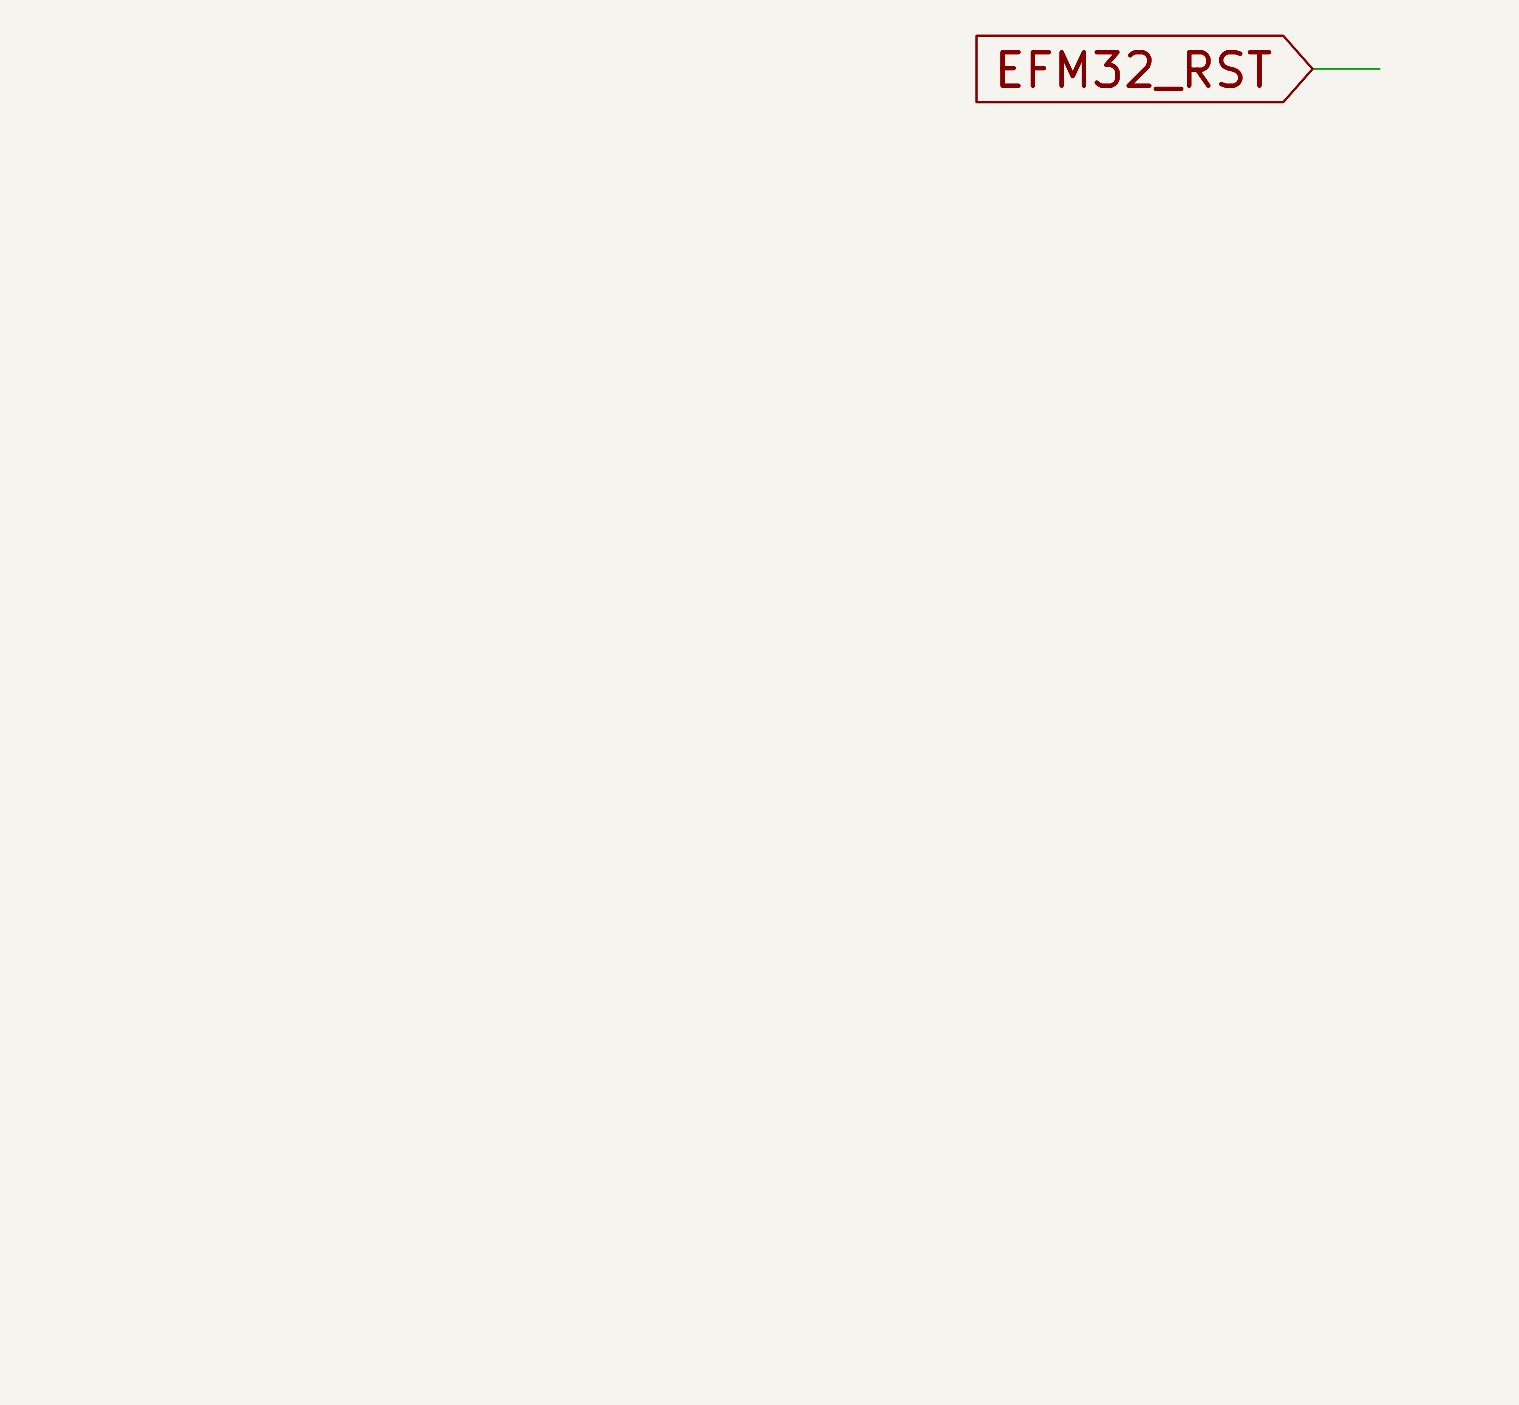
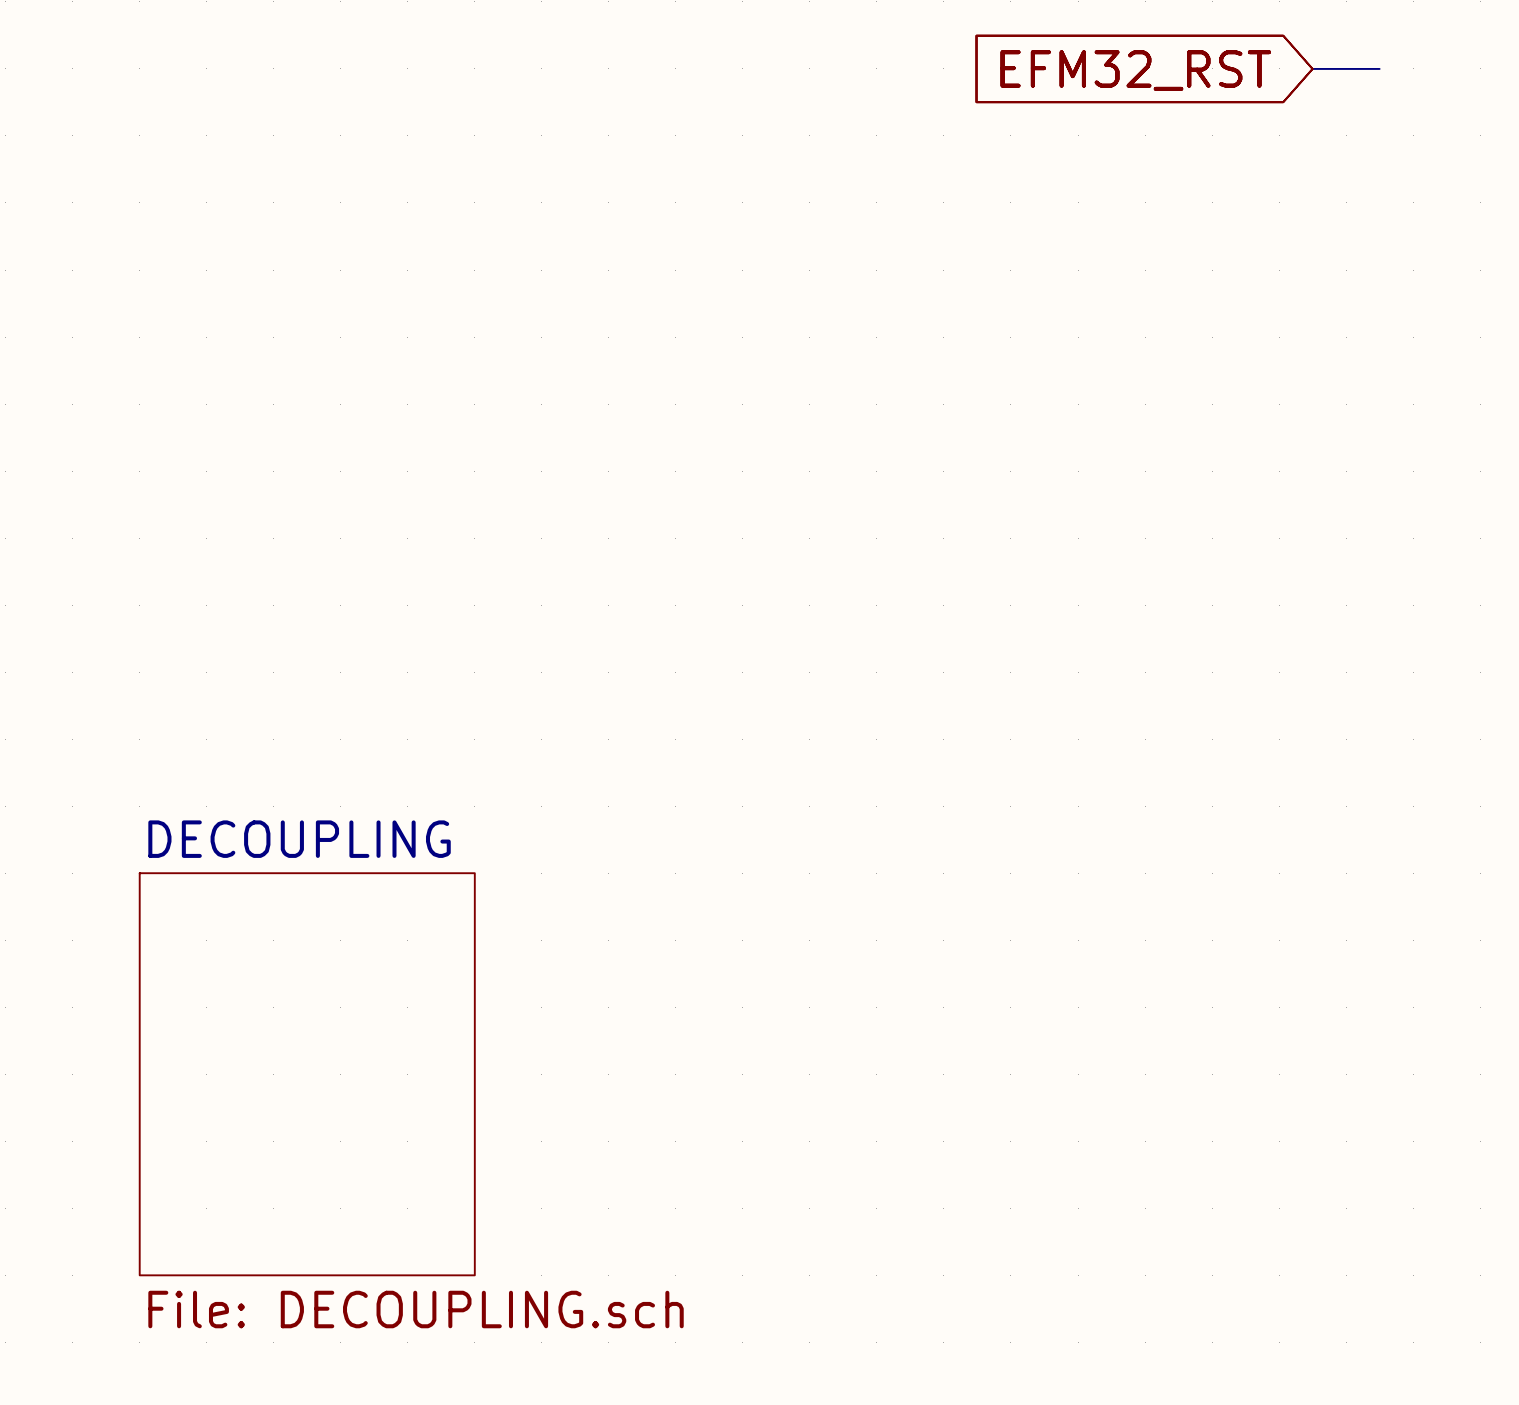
sheet DECOUPLING: none -> File: DECOUPLING.sch (307, 1074)

